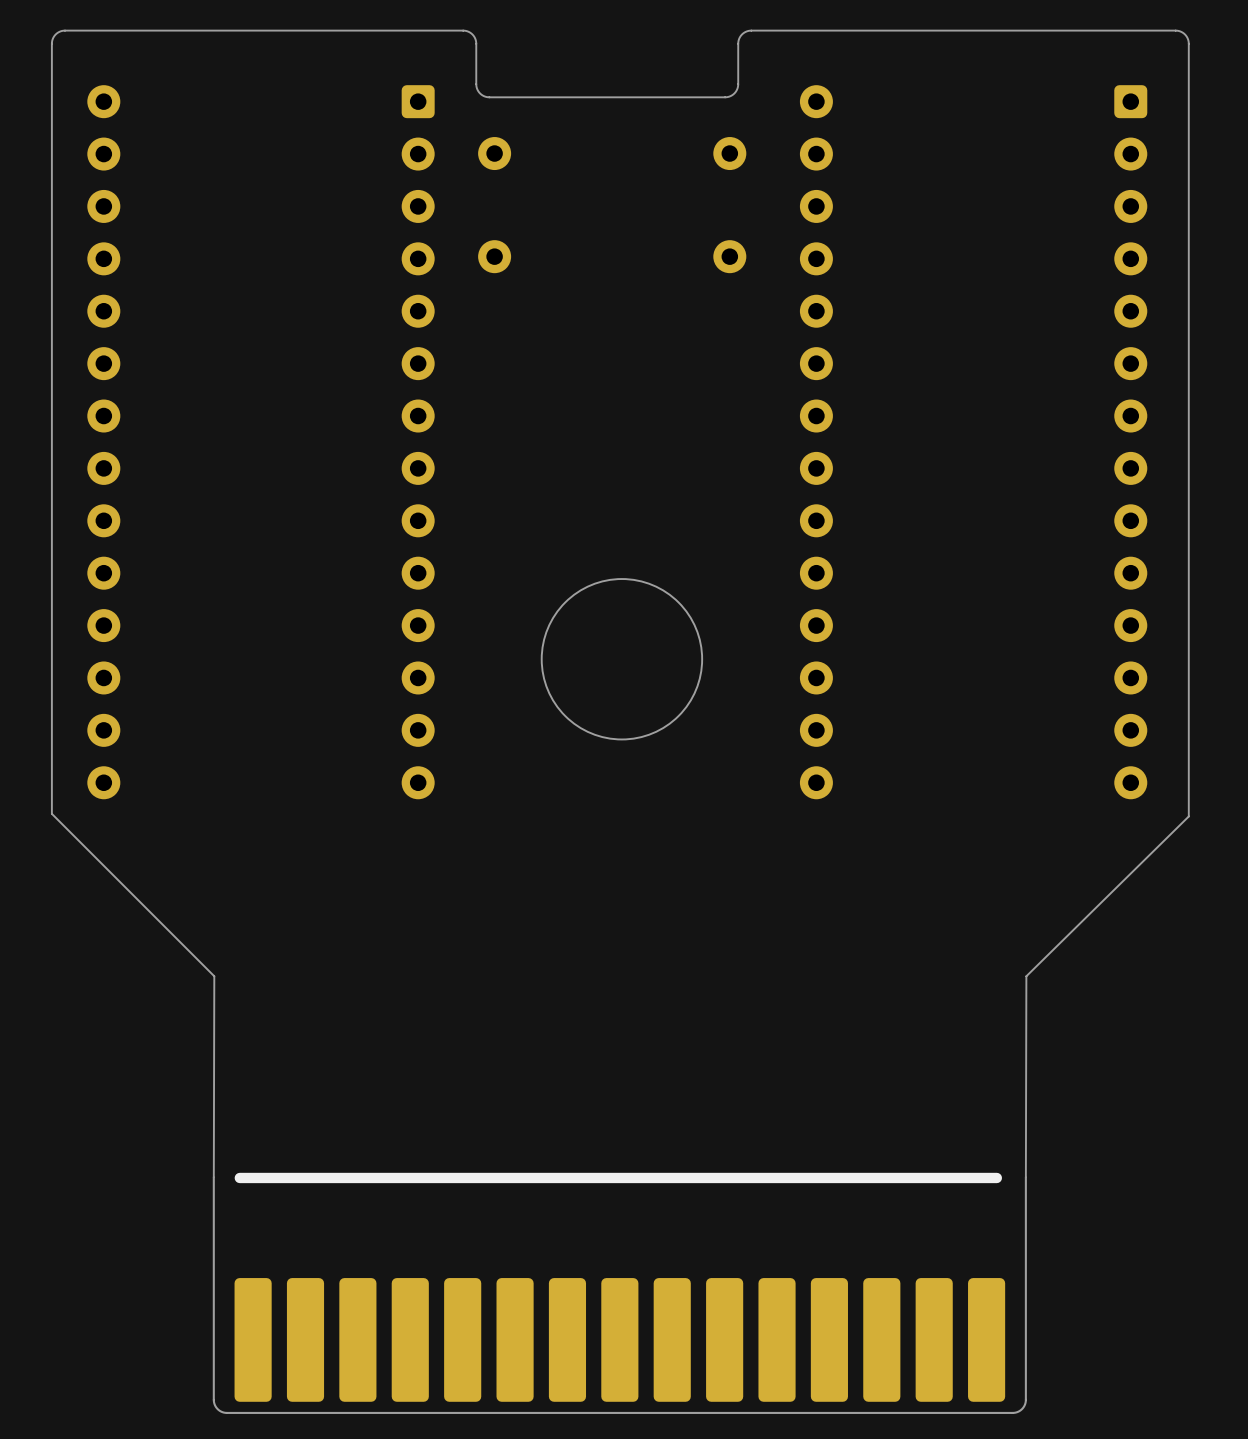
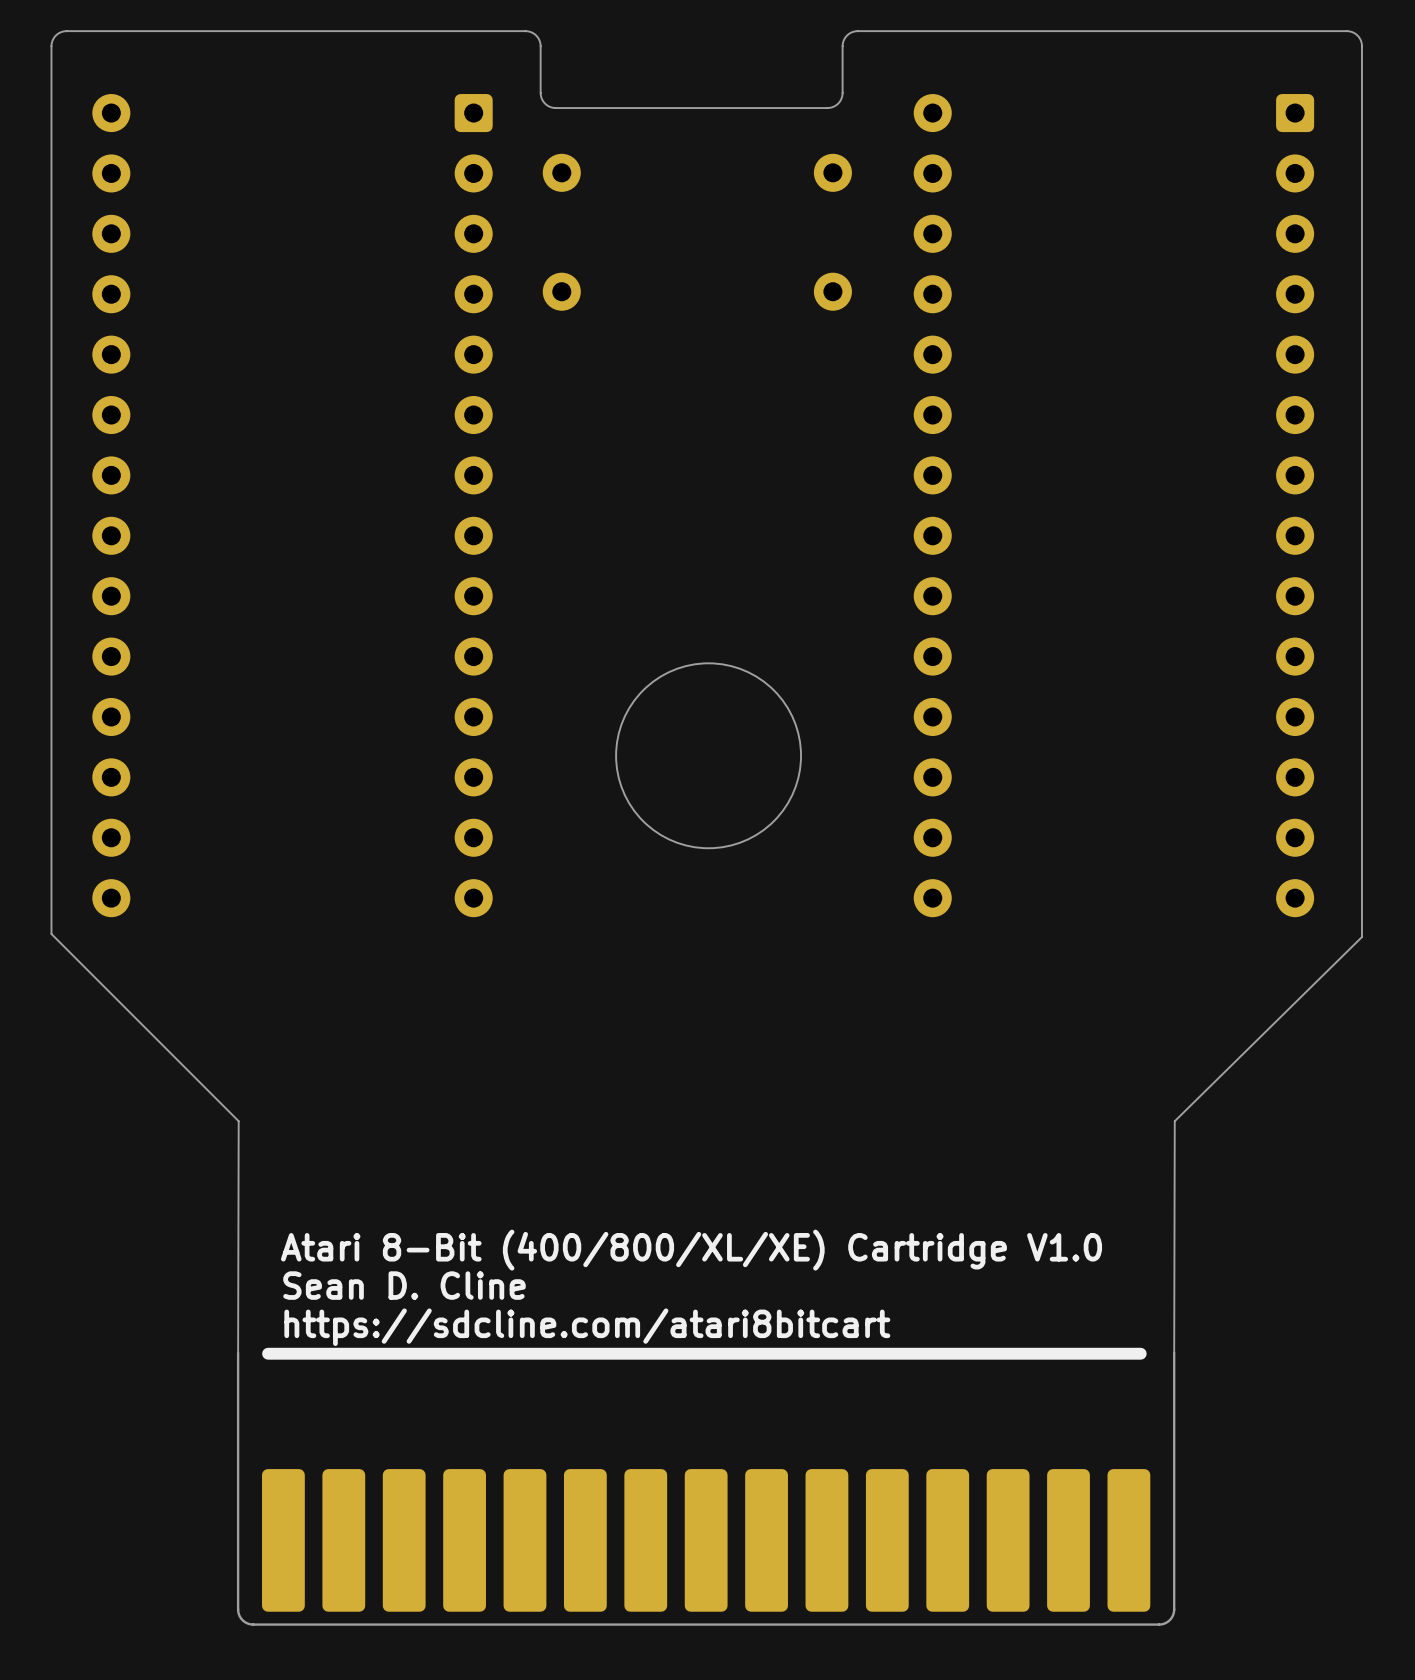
text: none -> Atari 8-Bit (400/800/XL/XE) Cartridge V1.0 (691, 1250)
text: none -> Sean D. Cline (404, 1285)
text: none -> https://sdcline.com/atari8bitcart (587, 1327)

